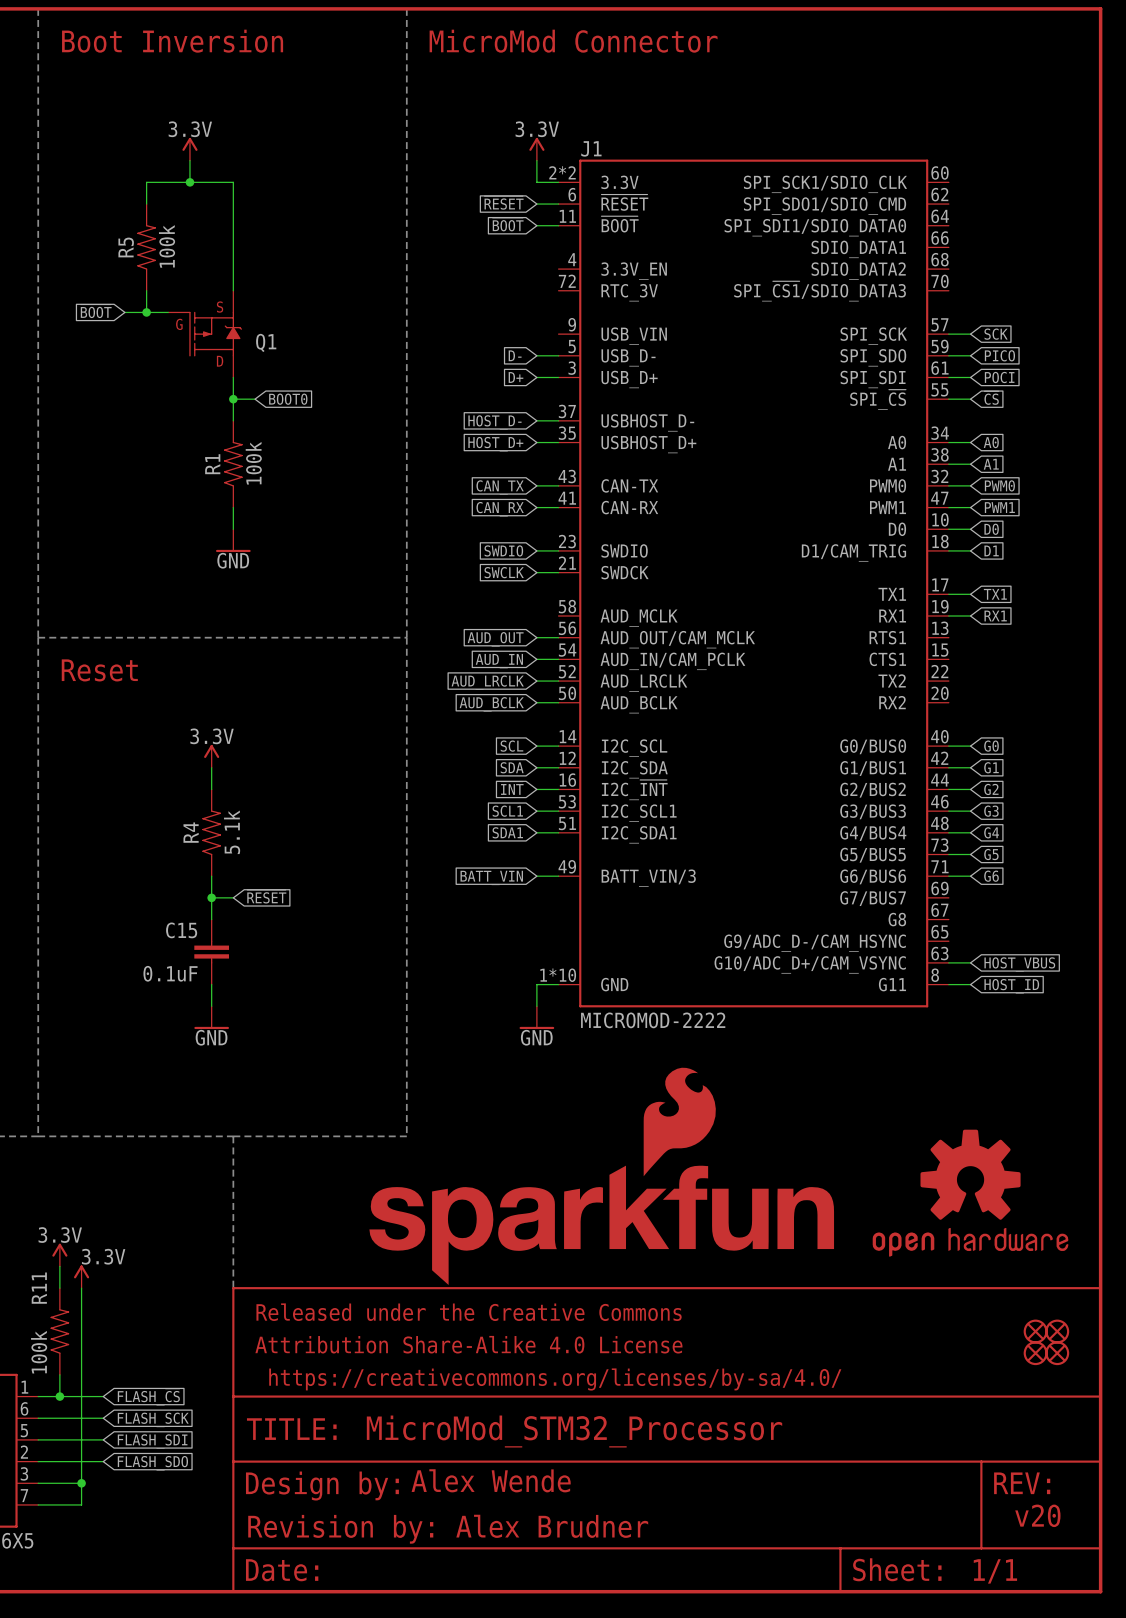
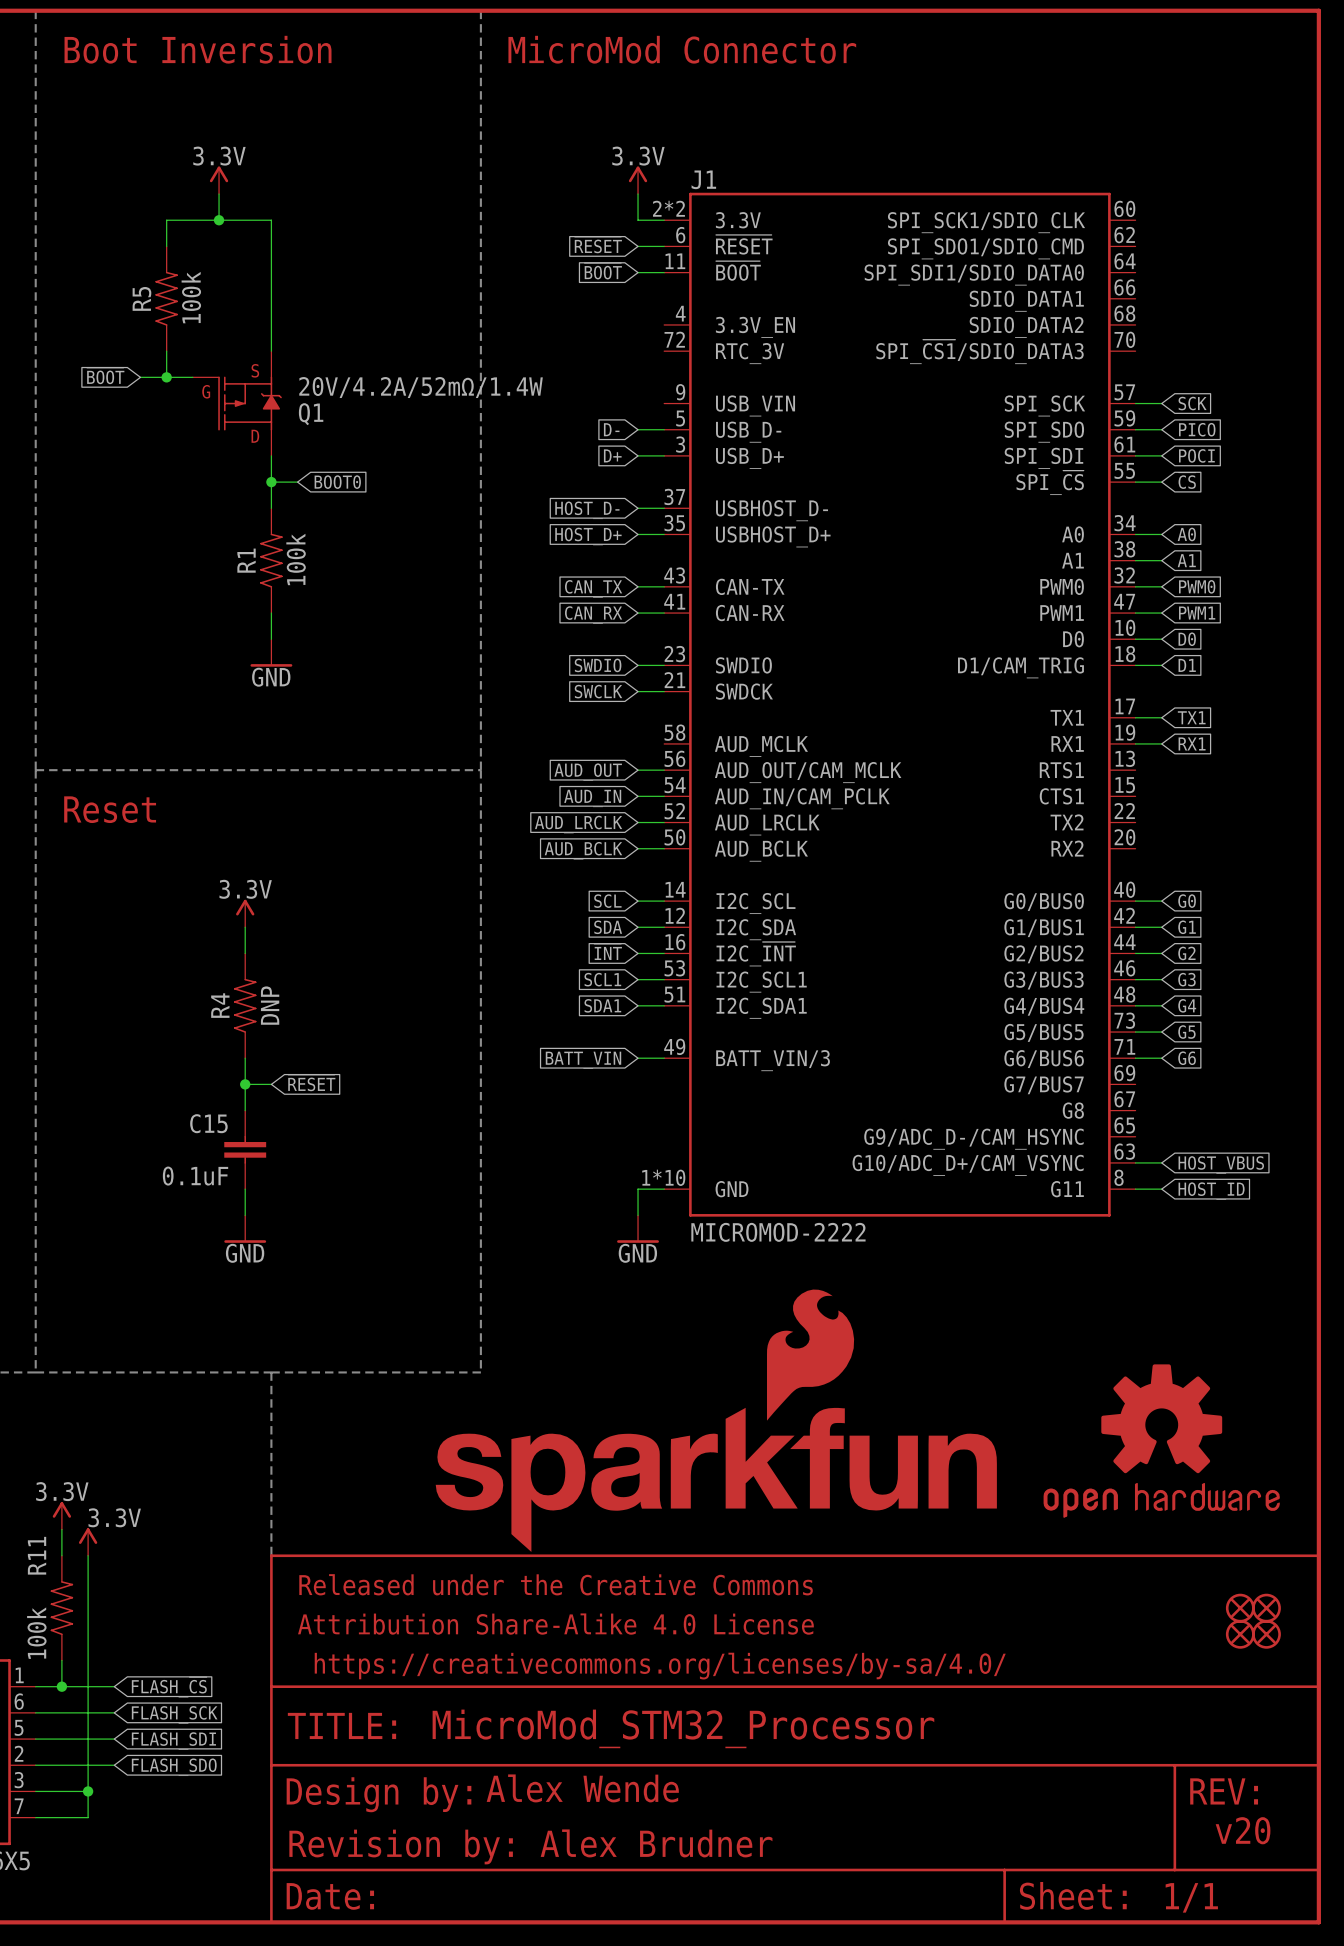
Q1 value: none -> 20V/4.2A/52mΩ/1.4W (421, 387)
R4 value: 5.1k (232, 832) -> DNP (270, 1005)

